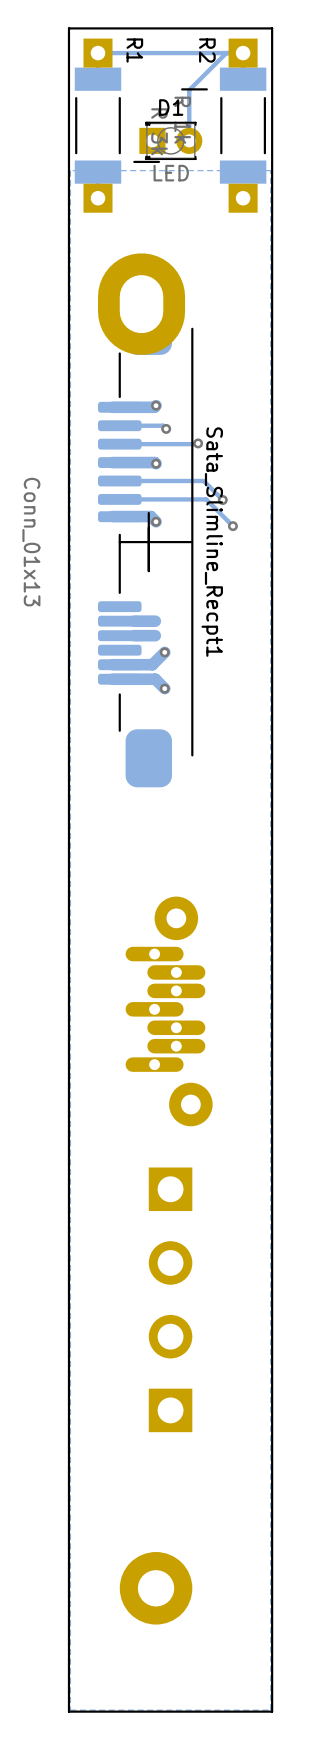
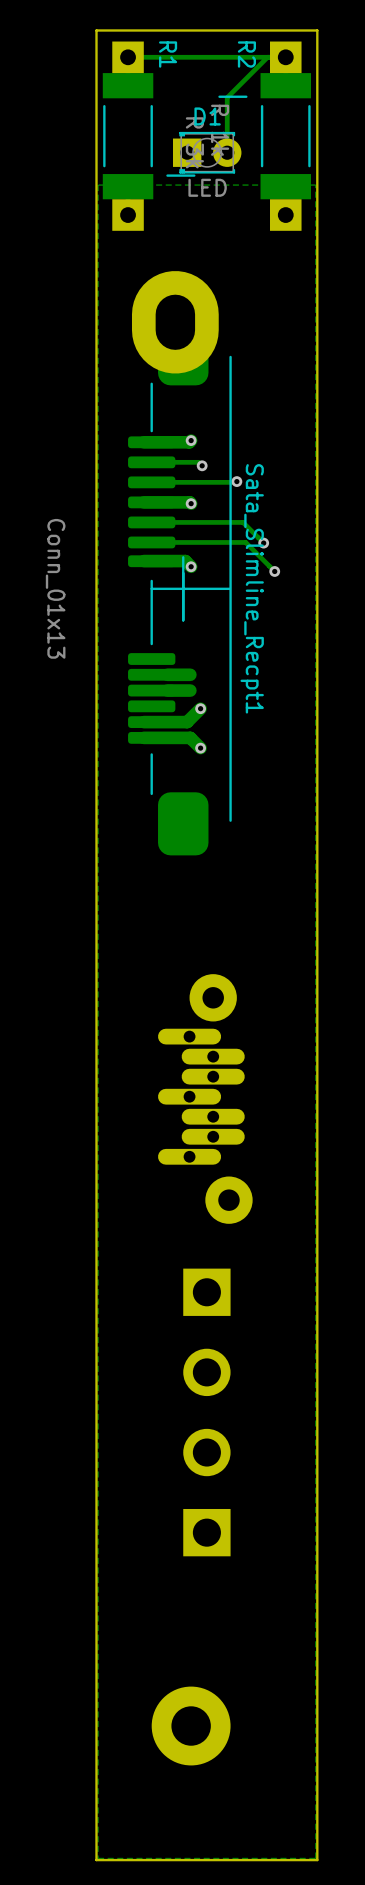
part footprint: [98, 253, 186, 355] -> [131, 271, 219, 374]

